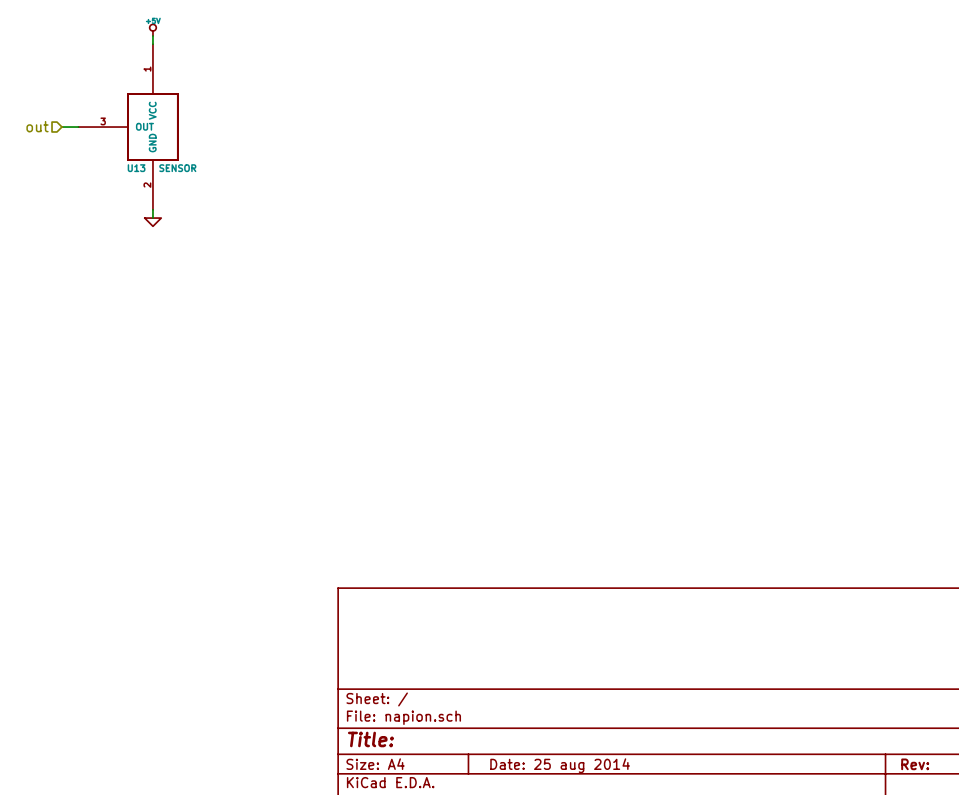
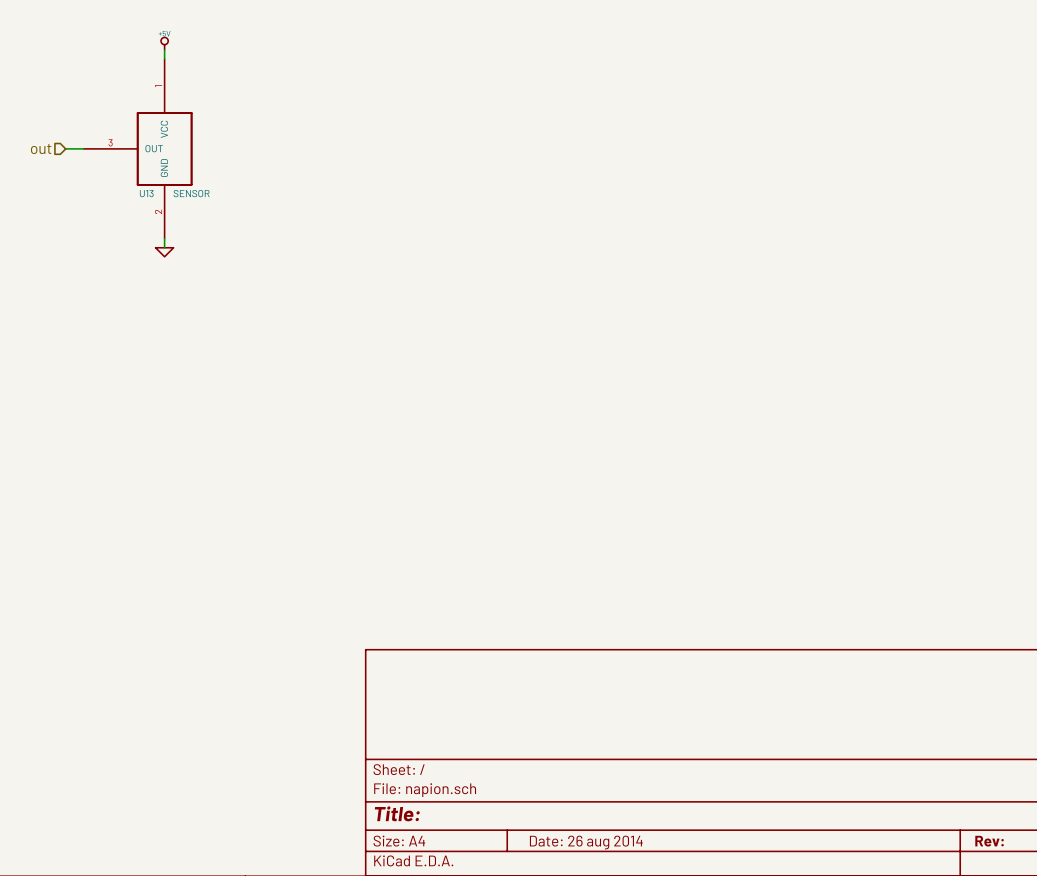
title block: Date: 25 aug 2014 (560, 765) -> Date: 26 aug 2014 (586, 842)

